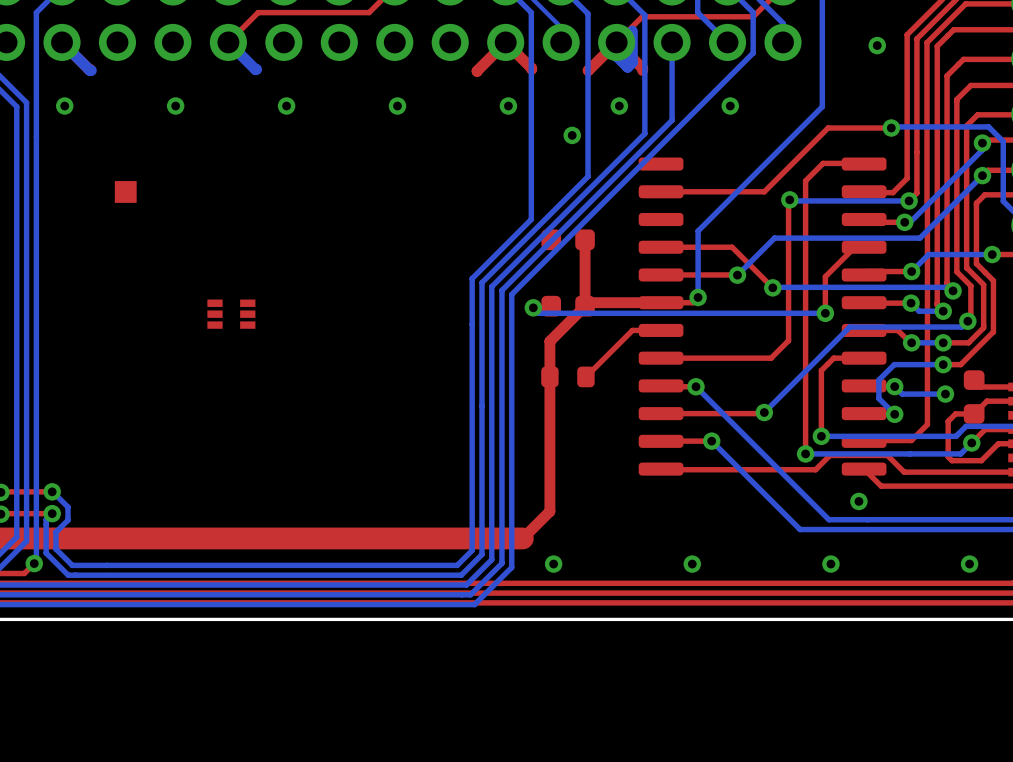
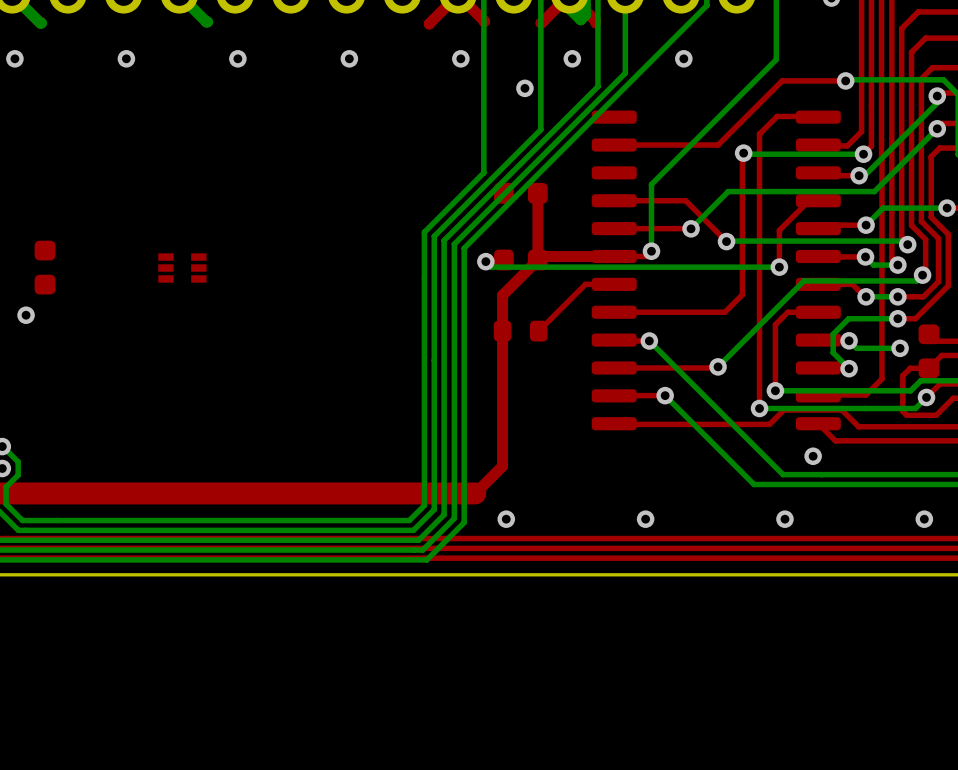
part: (125, 191) -> none
part: none -> (45, 267)
via: none -> (26, 315)

